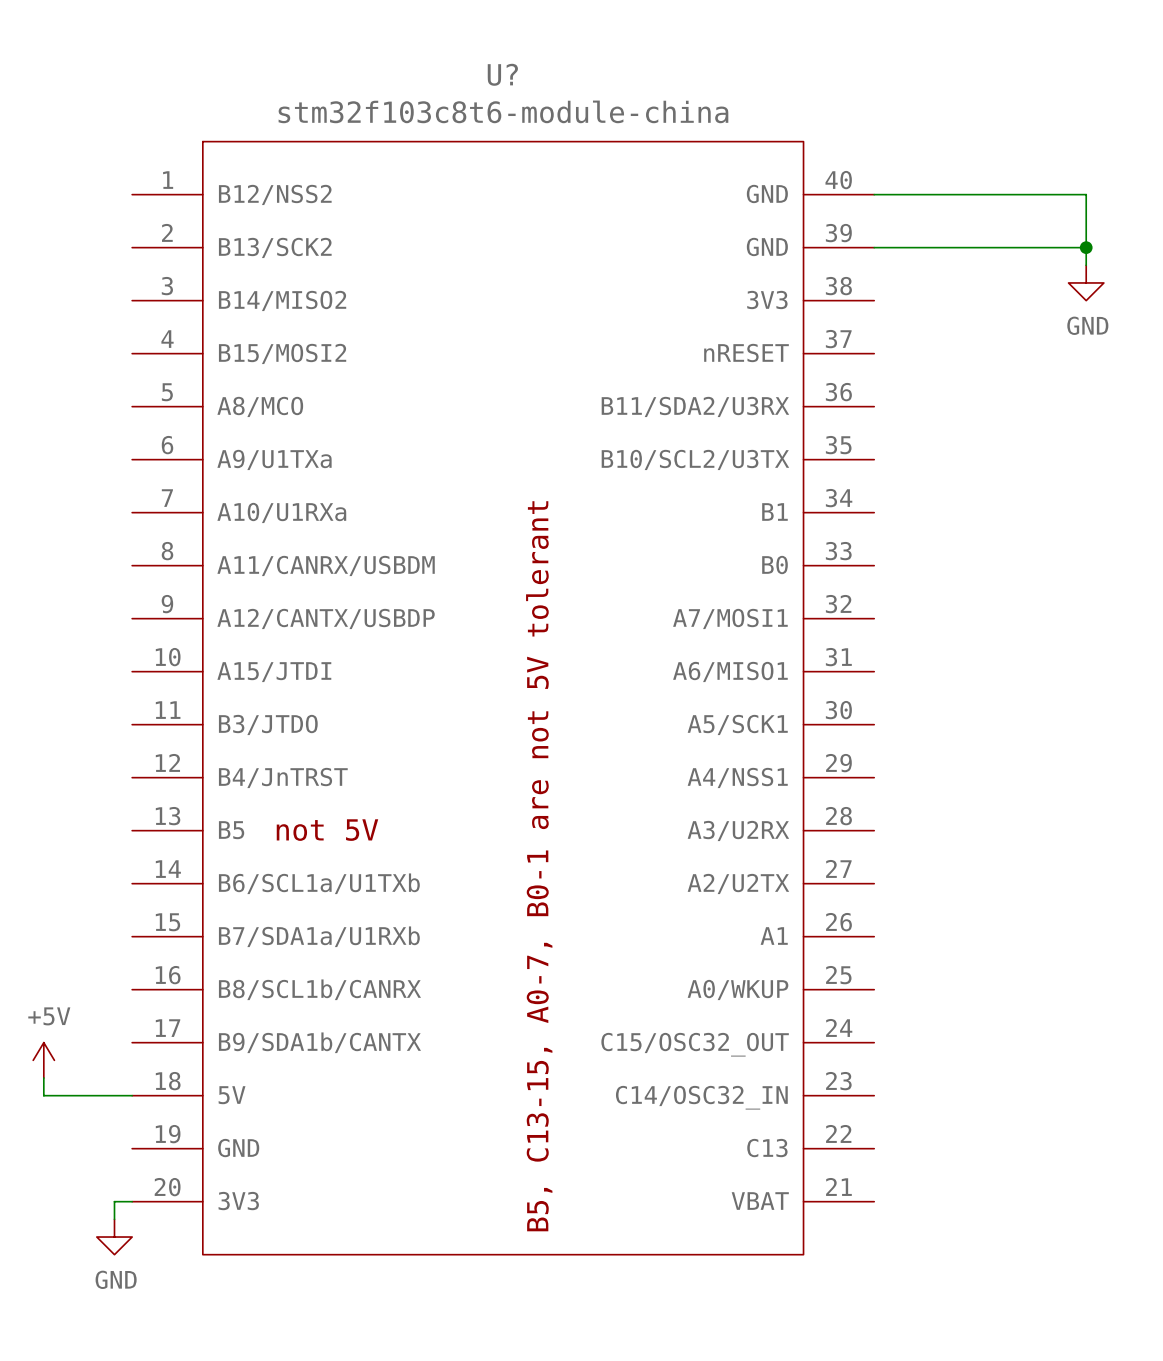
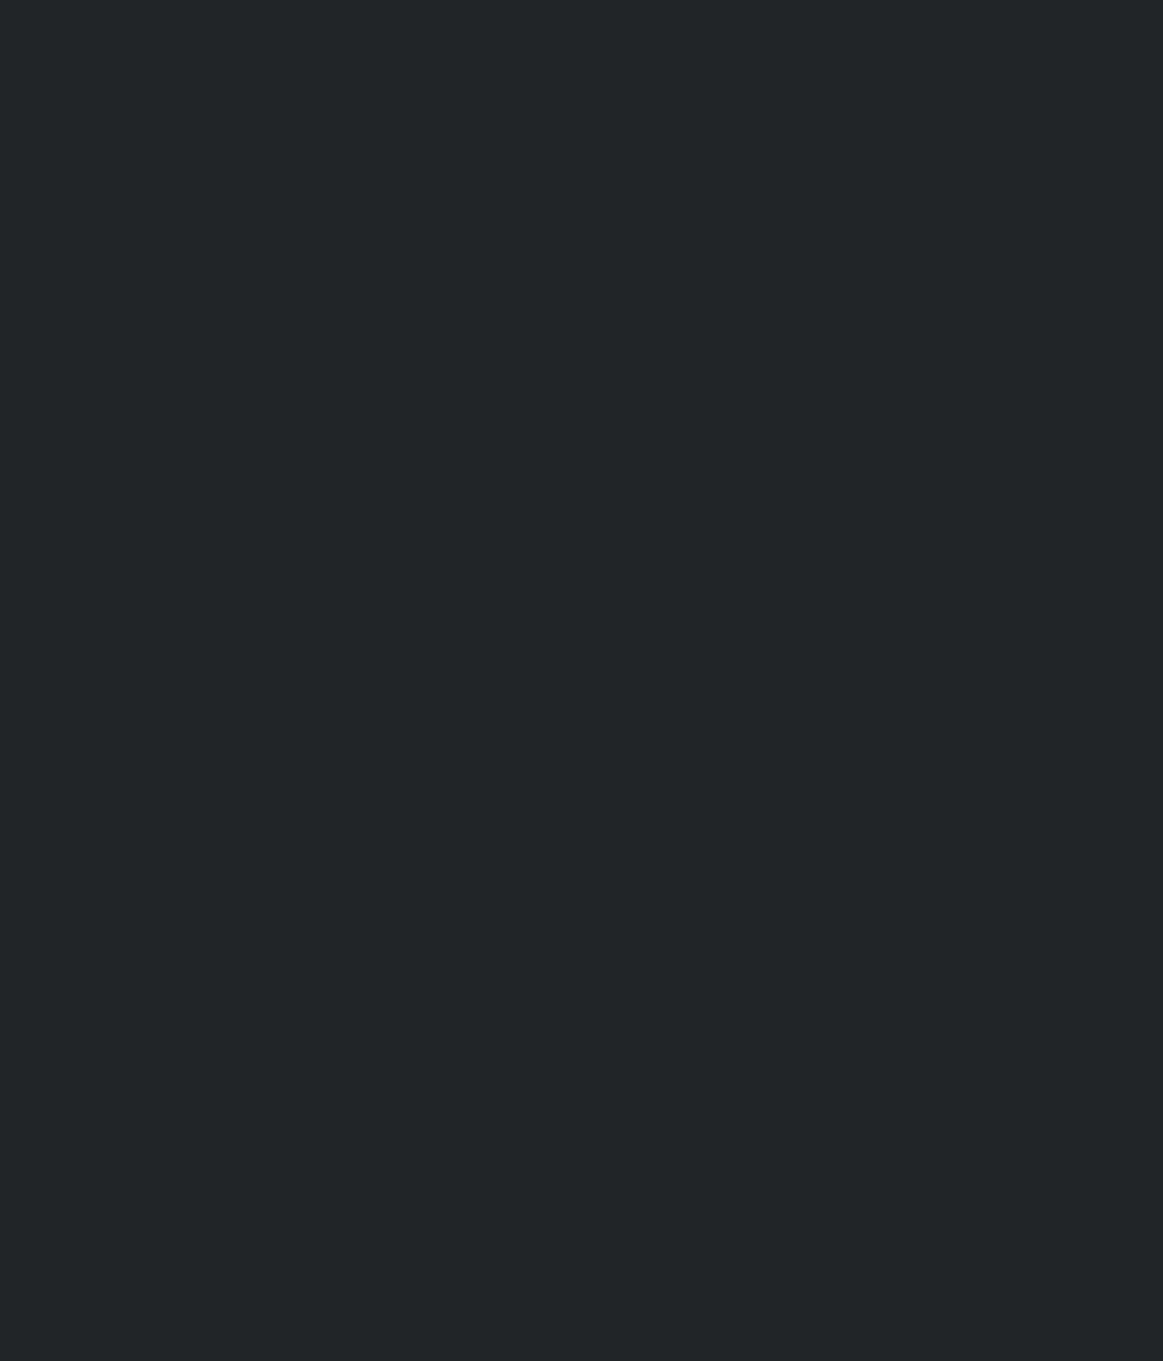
wire: (874, 194) (1086, 194) (1086, 265) -> none
wire: (874, 247) (1086, 247) -> none
junction: (1086, 247) -> none
power symbol: GND (1086, 282) -> none
U?: stm32f103c8t6-module-china (503, 698) -> none
power symbol: +5V (43, 1060) -> none
wire: (43, 1078) (43, 1095) (132, 1095) -> none
wire: (132, 1201) (114, 1201) (114, 1219) -> none
power symbol: GND (114, 1237) -> none

